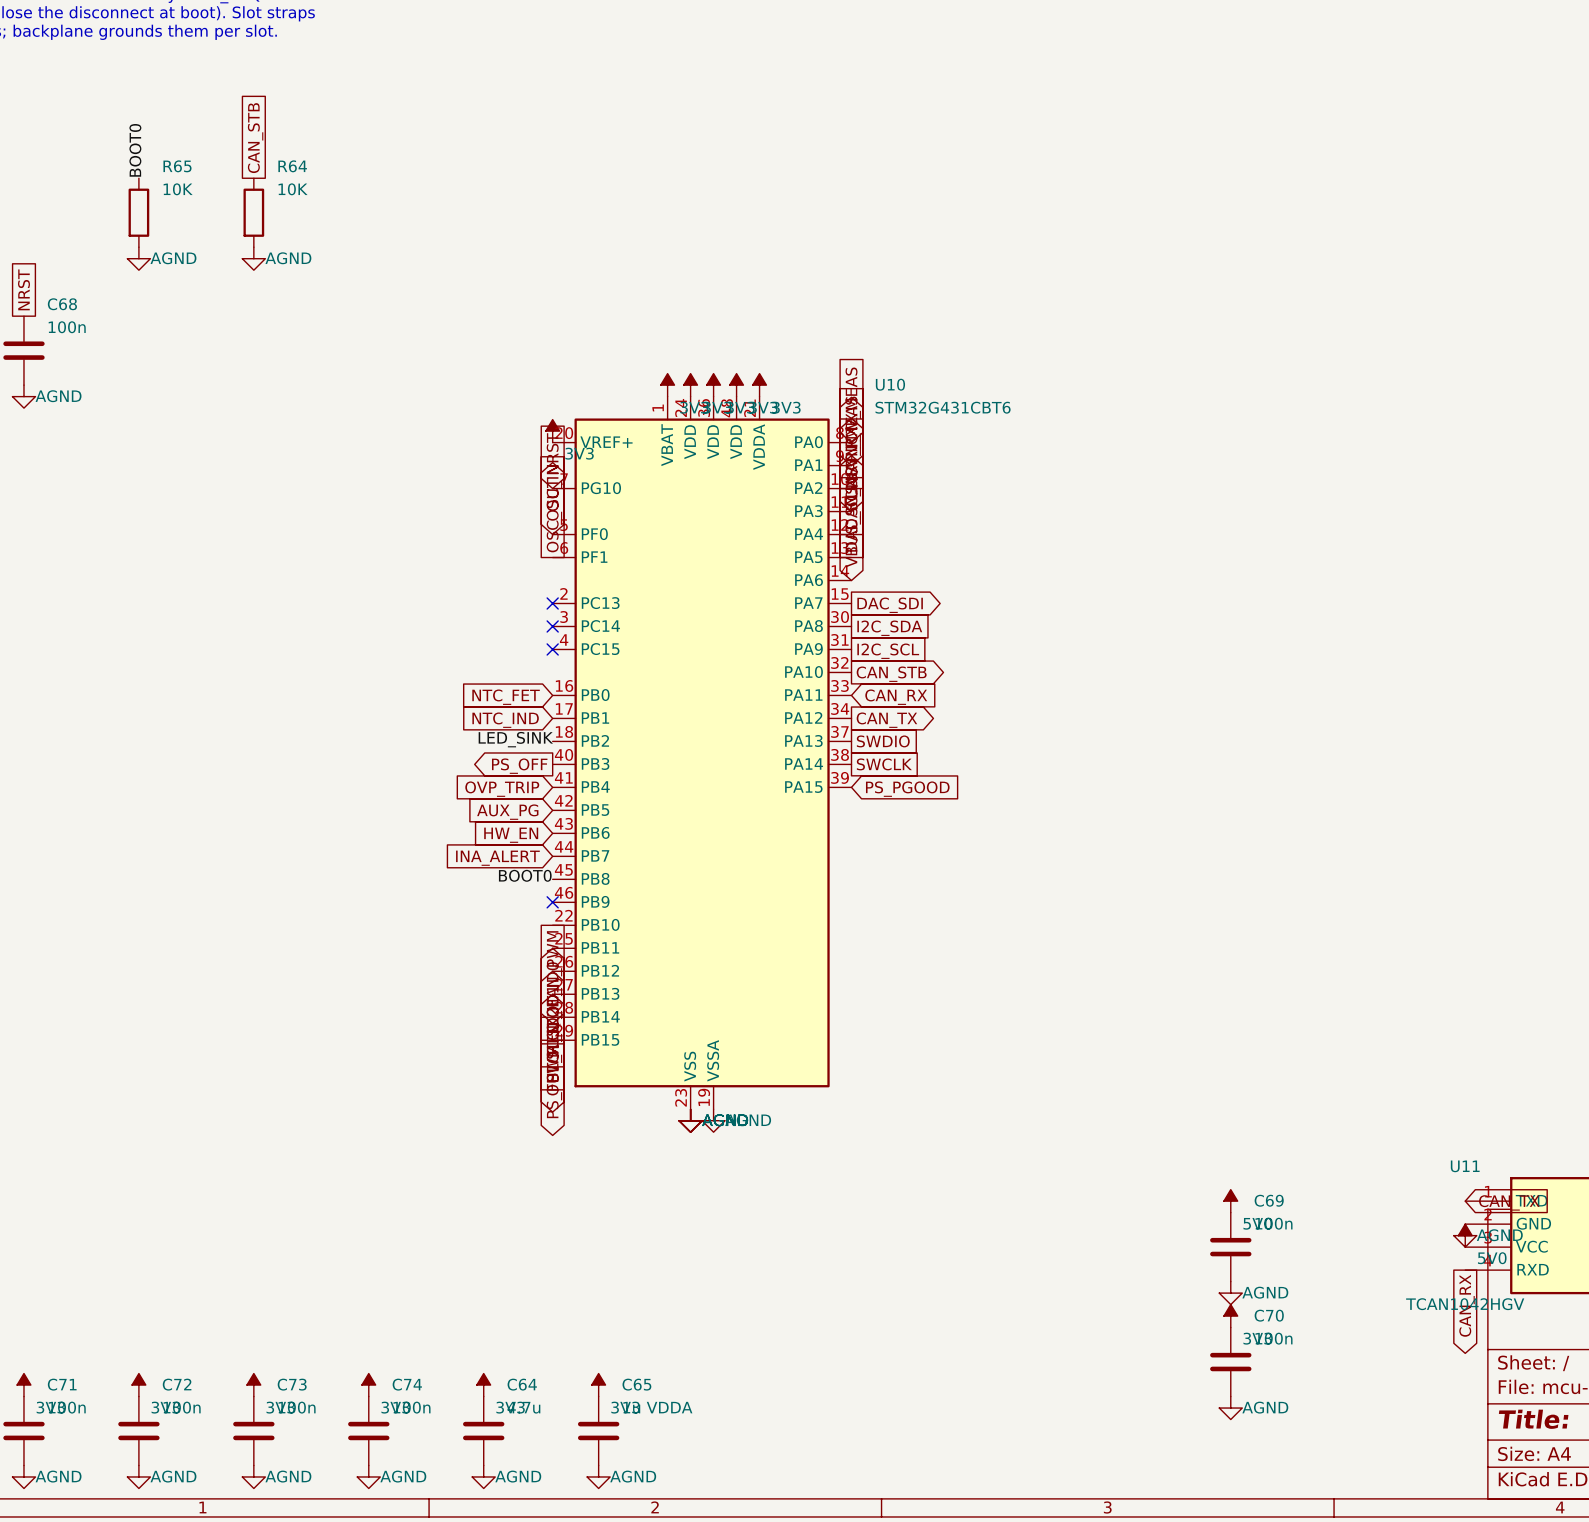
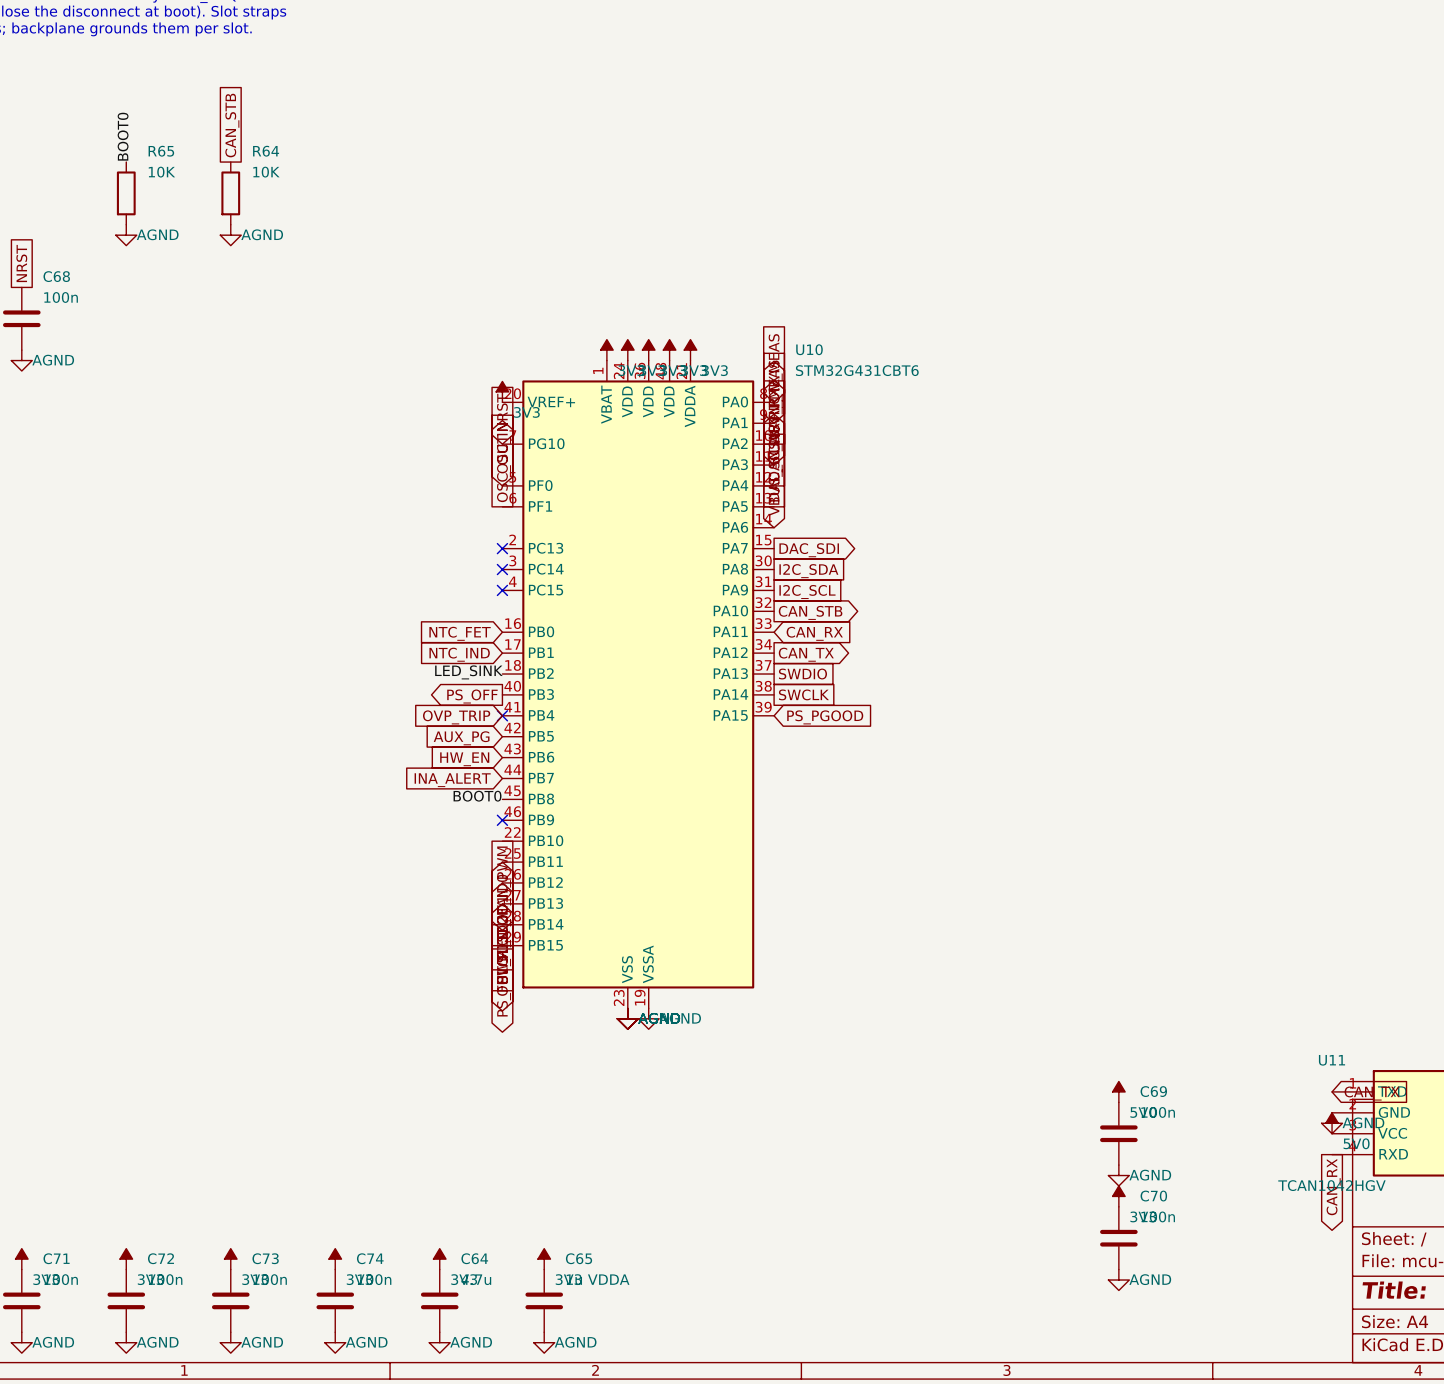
no-connect mark: none -> (502, 715)

